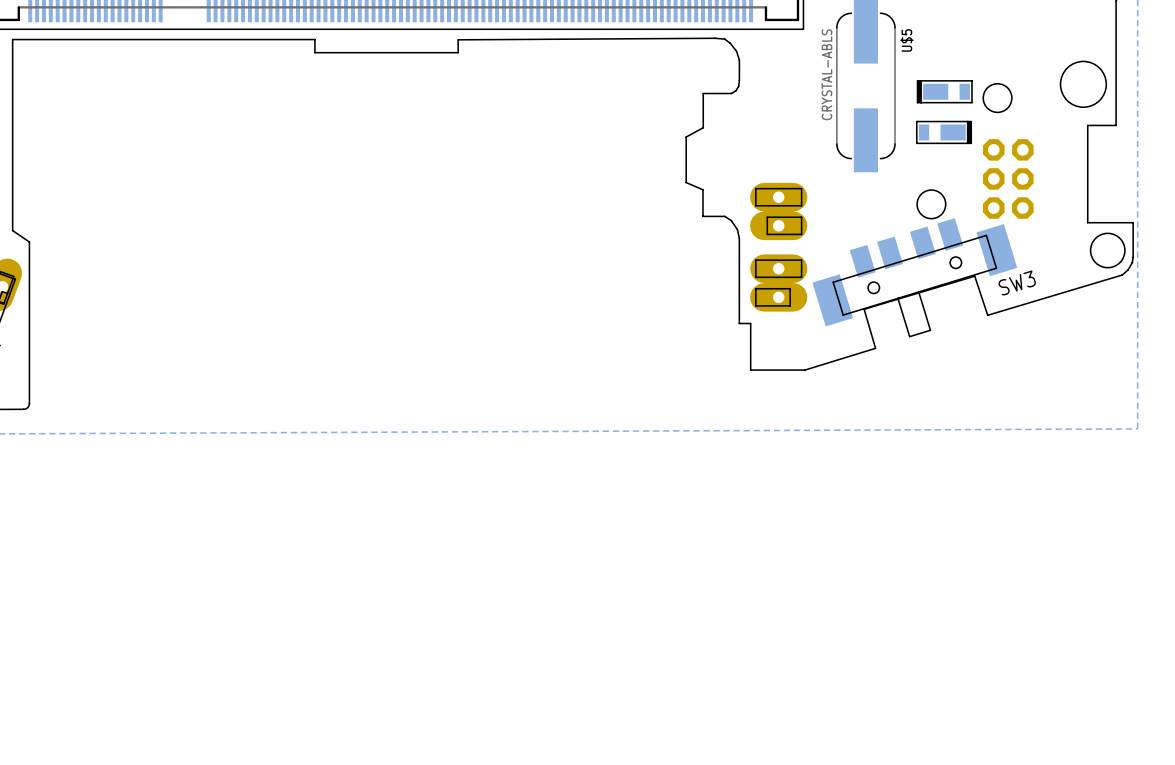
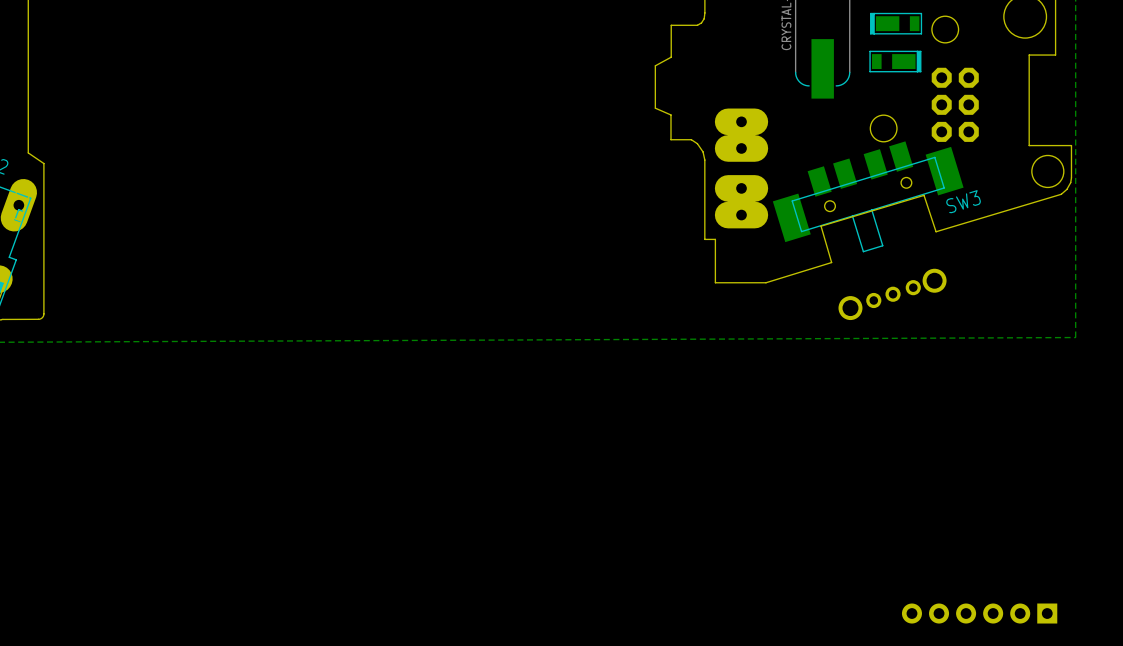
part: none -> (892, 294)
part: none -> (979, 613)

